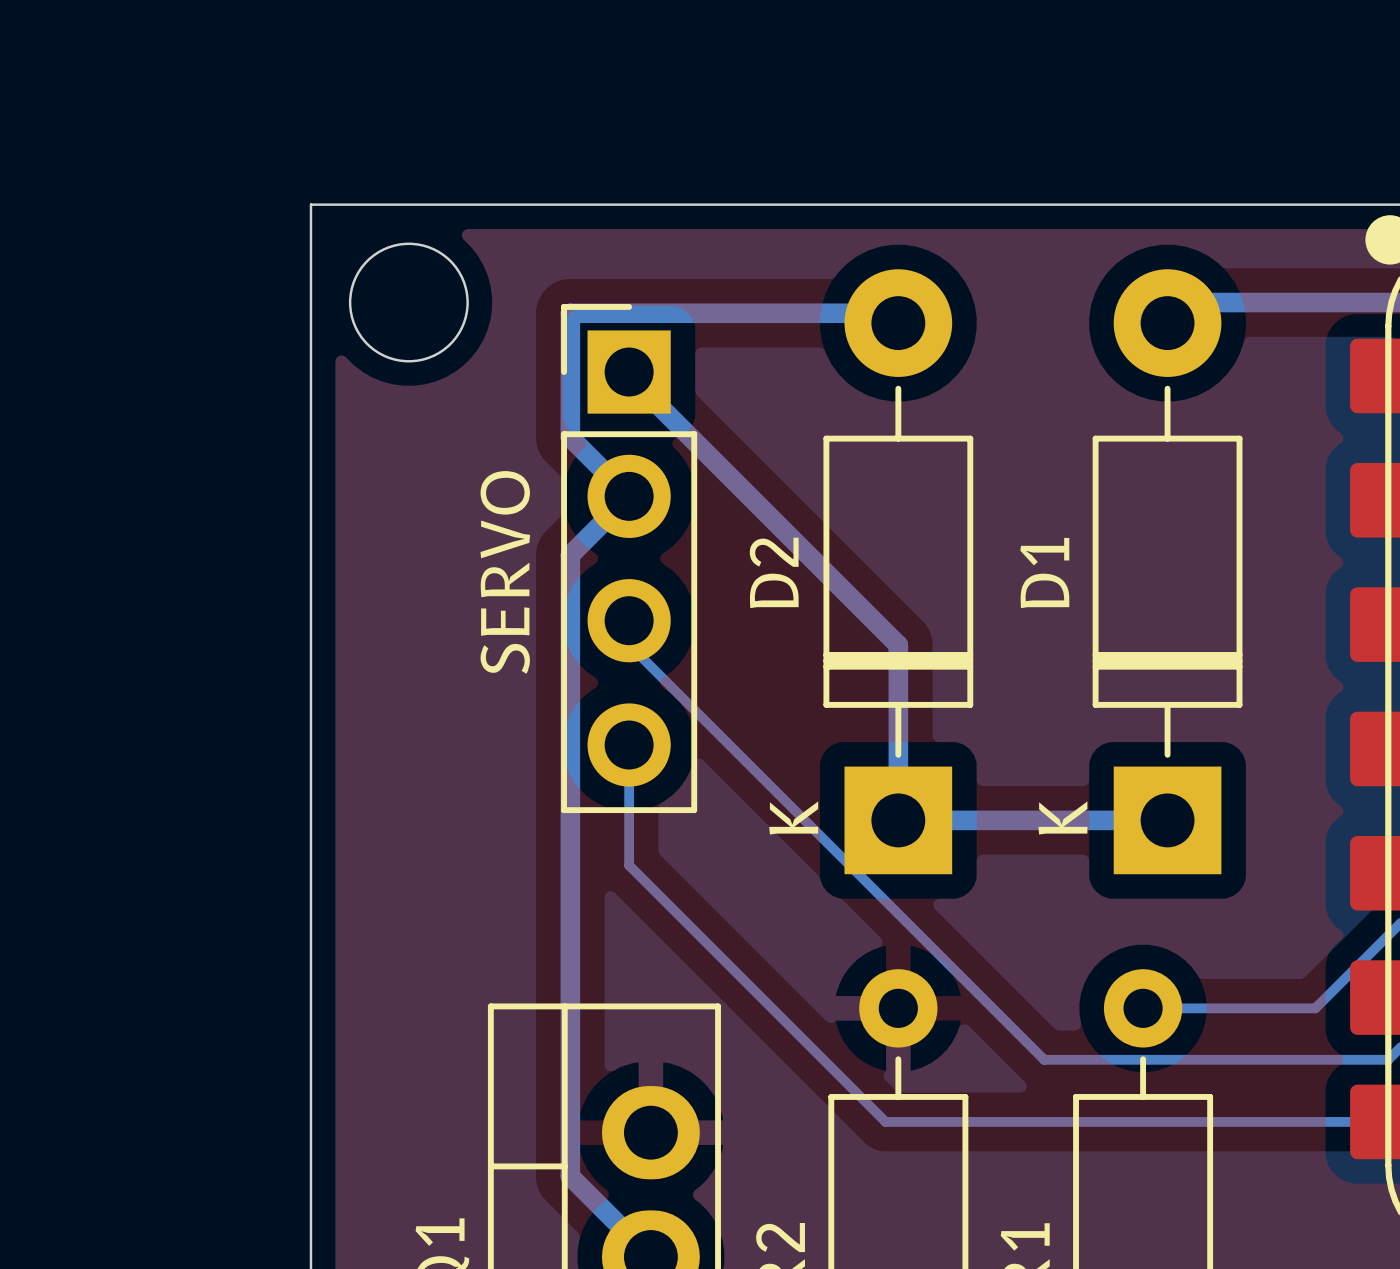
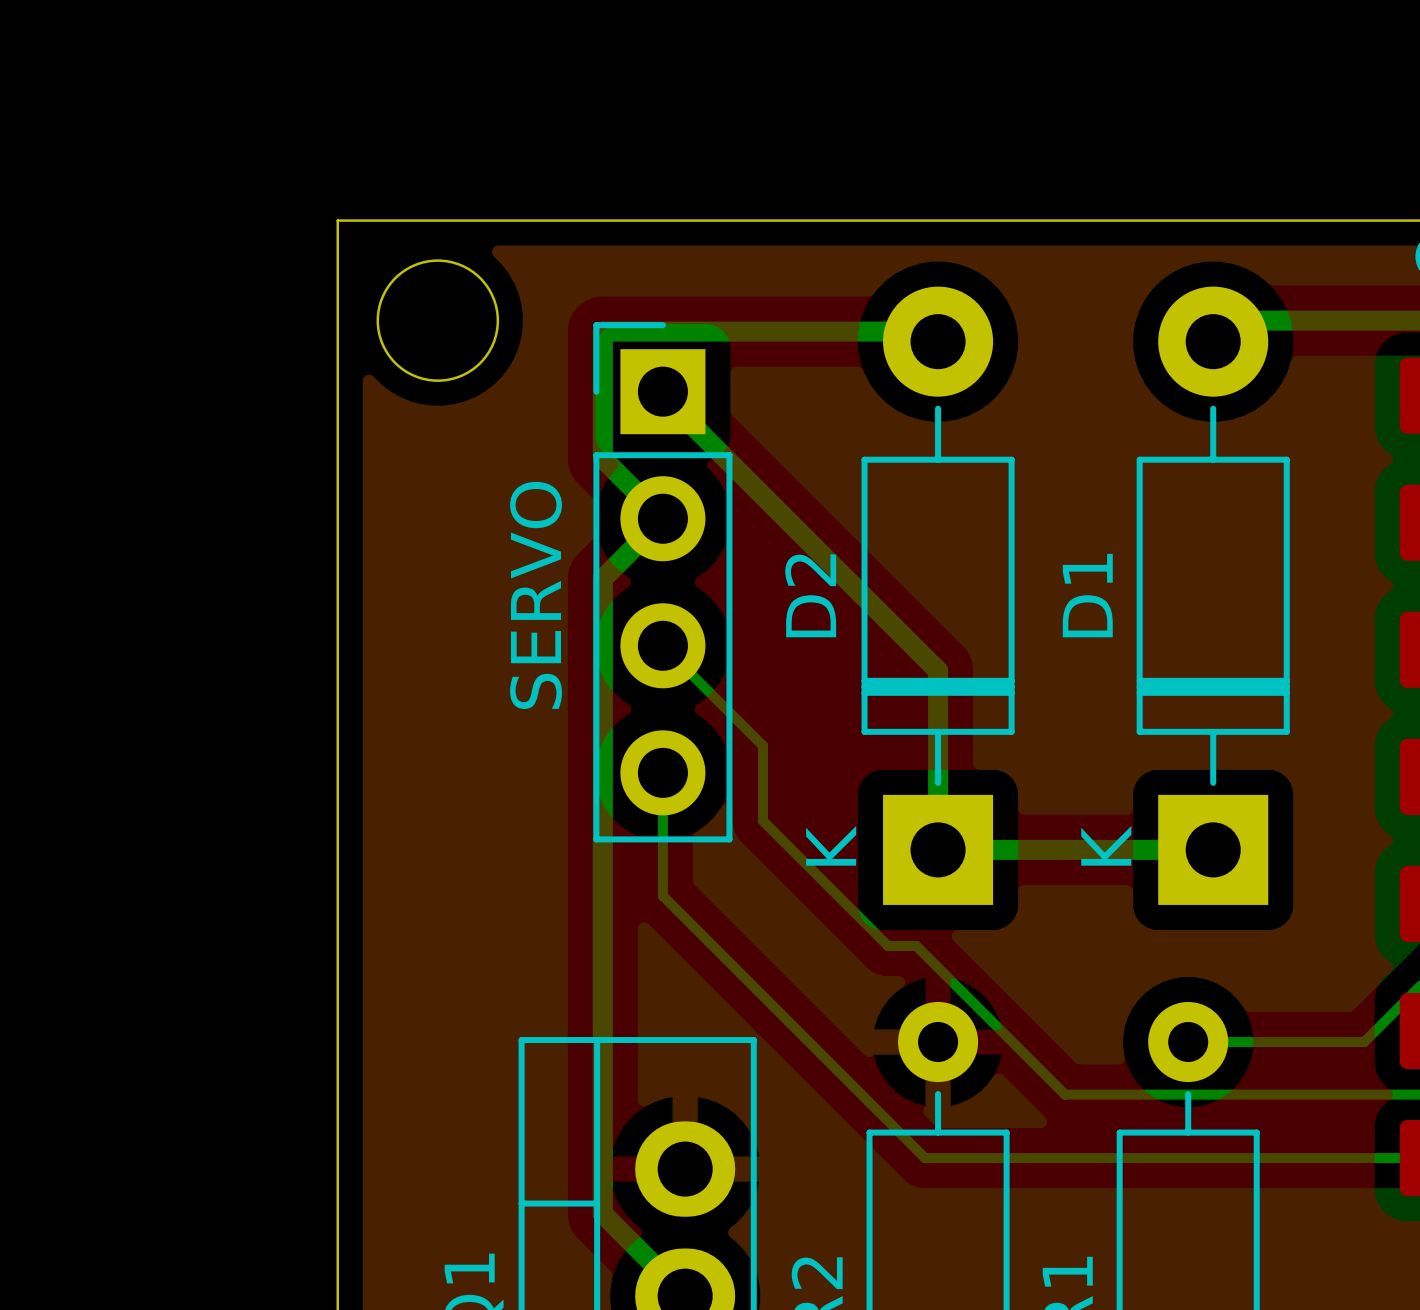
bottom track: (629, 644) (1044, 1059) -> (662, 645) (762, 745) (762, 820) (888, 945) (916, 945) (1065, 1094) (1087, 1094)

